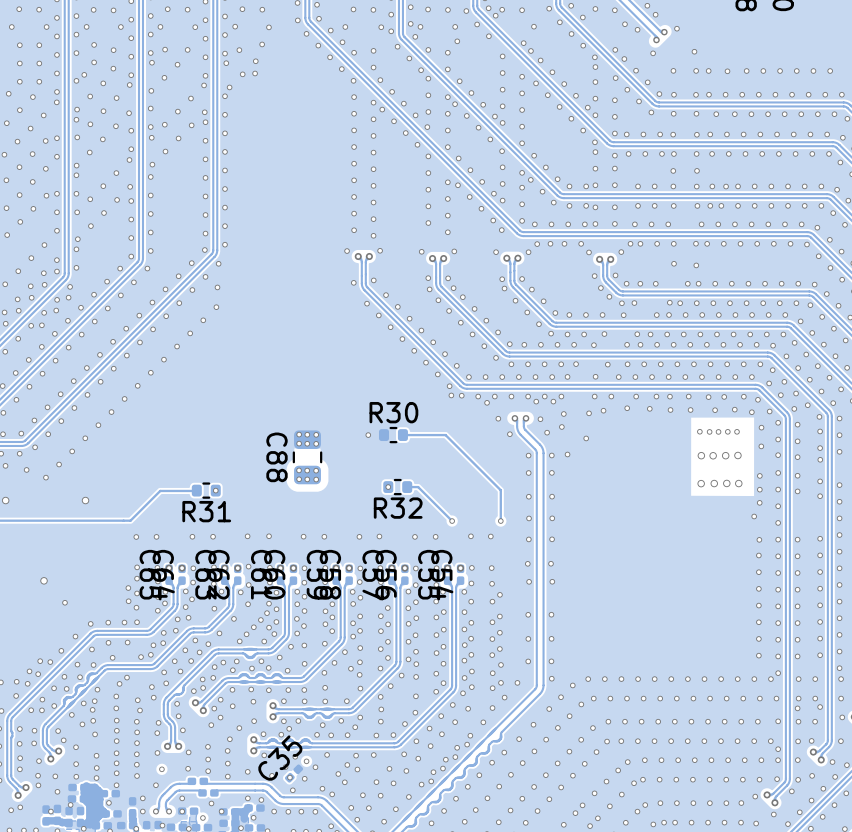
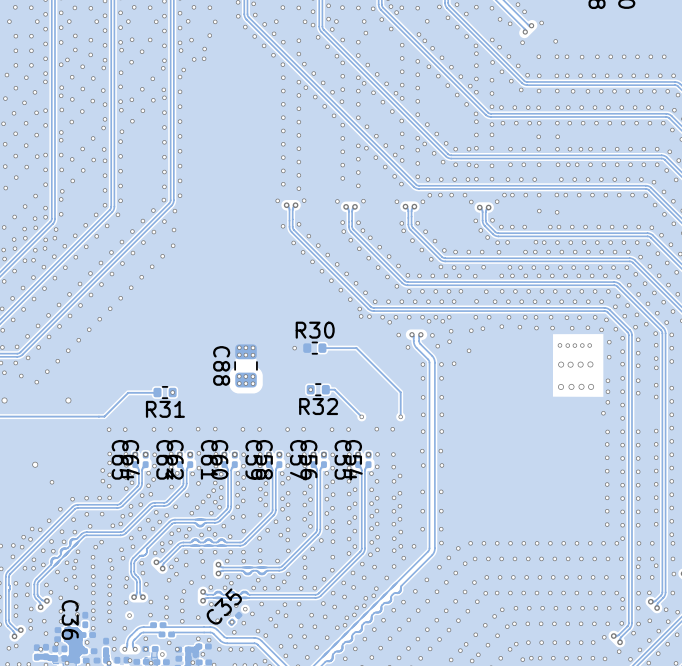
C36: none -> (85, 620)

